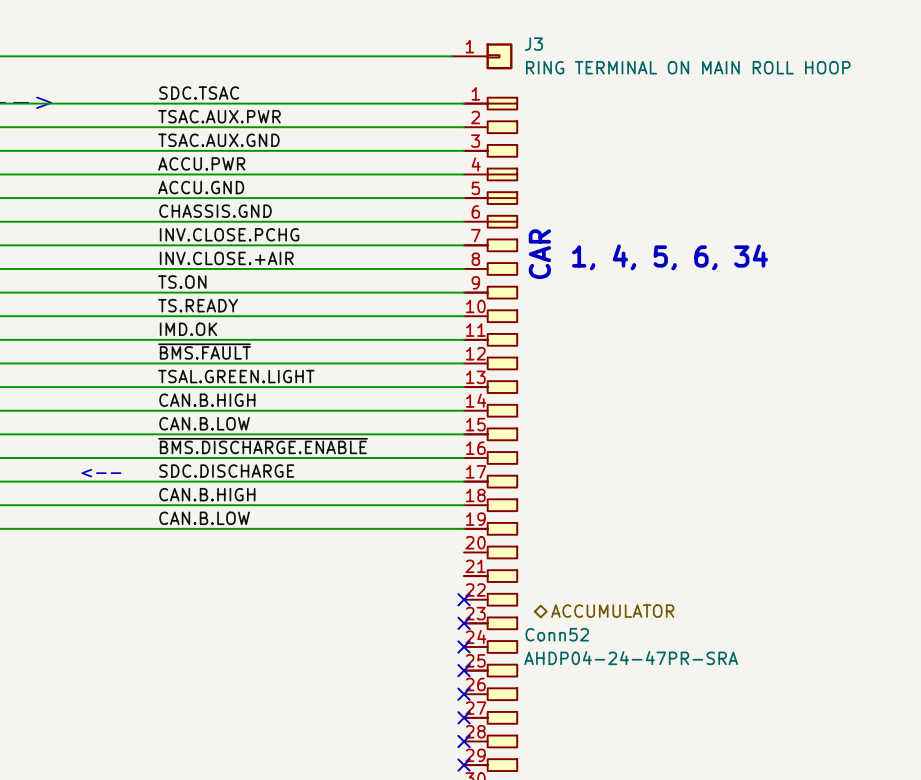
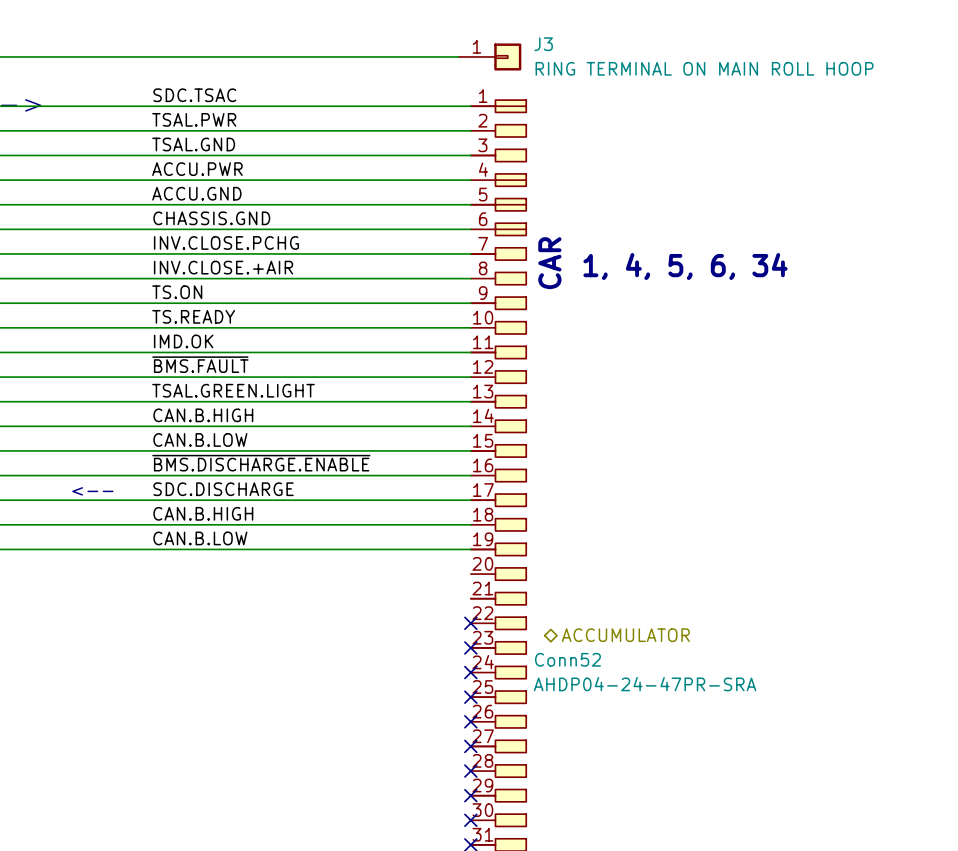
label: TSAC.AUX.PWR (219, 116) -> TSAL.PWR (194, 119)
label: TSAC.AUX.GND (218, 140) -> TSAL.GND (193, 144)

